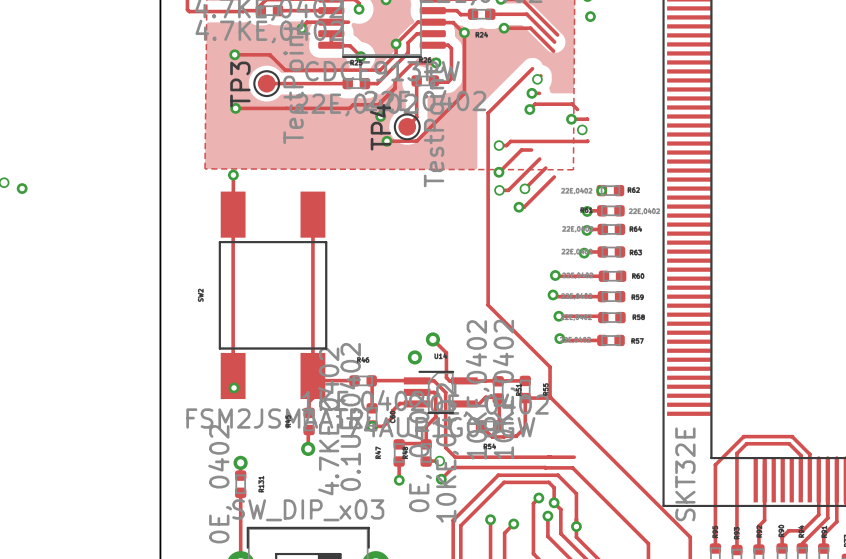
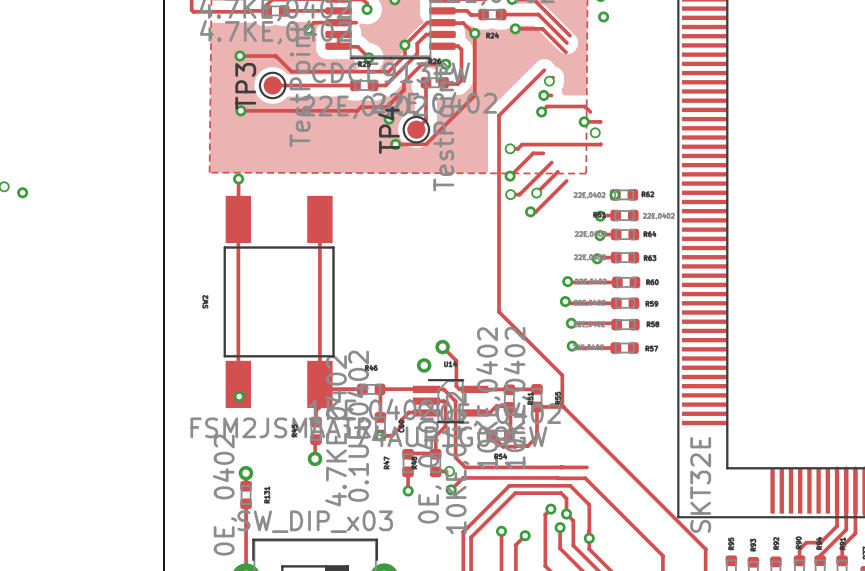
track: (764, 464) (764, 520) (758, 526) (758, 549) -> none
track: (800, 496) (800, 455) (789, 443) (746, 443) (736, 453) (736, 549) -> none
track: (809, 499) (809, 454) (792, 436) (743, 436) (715, 464) (715, 548) -> none

